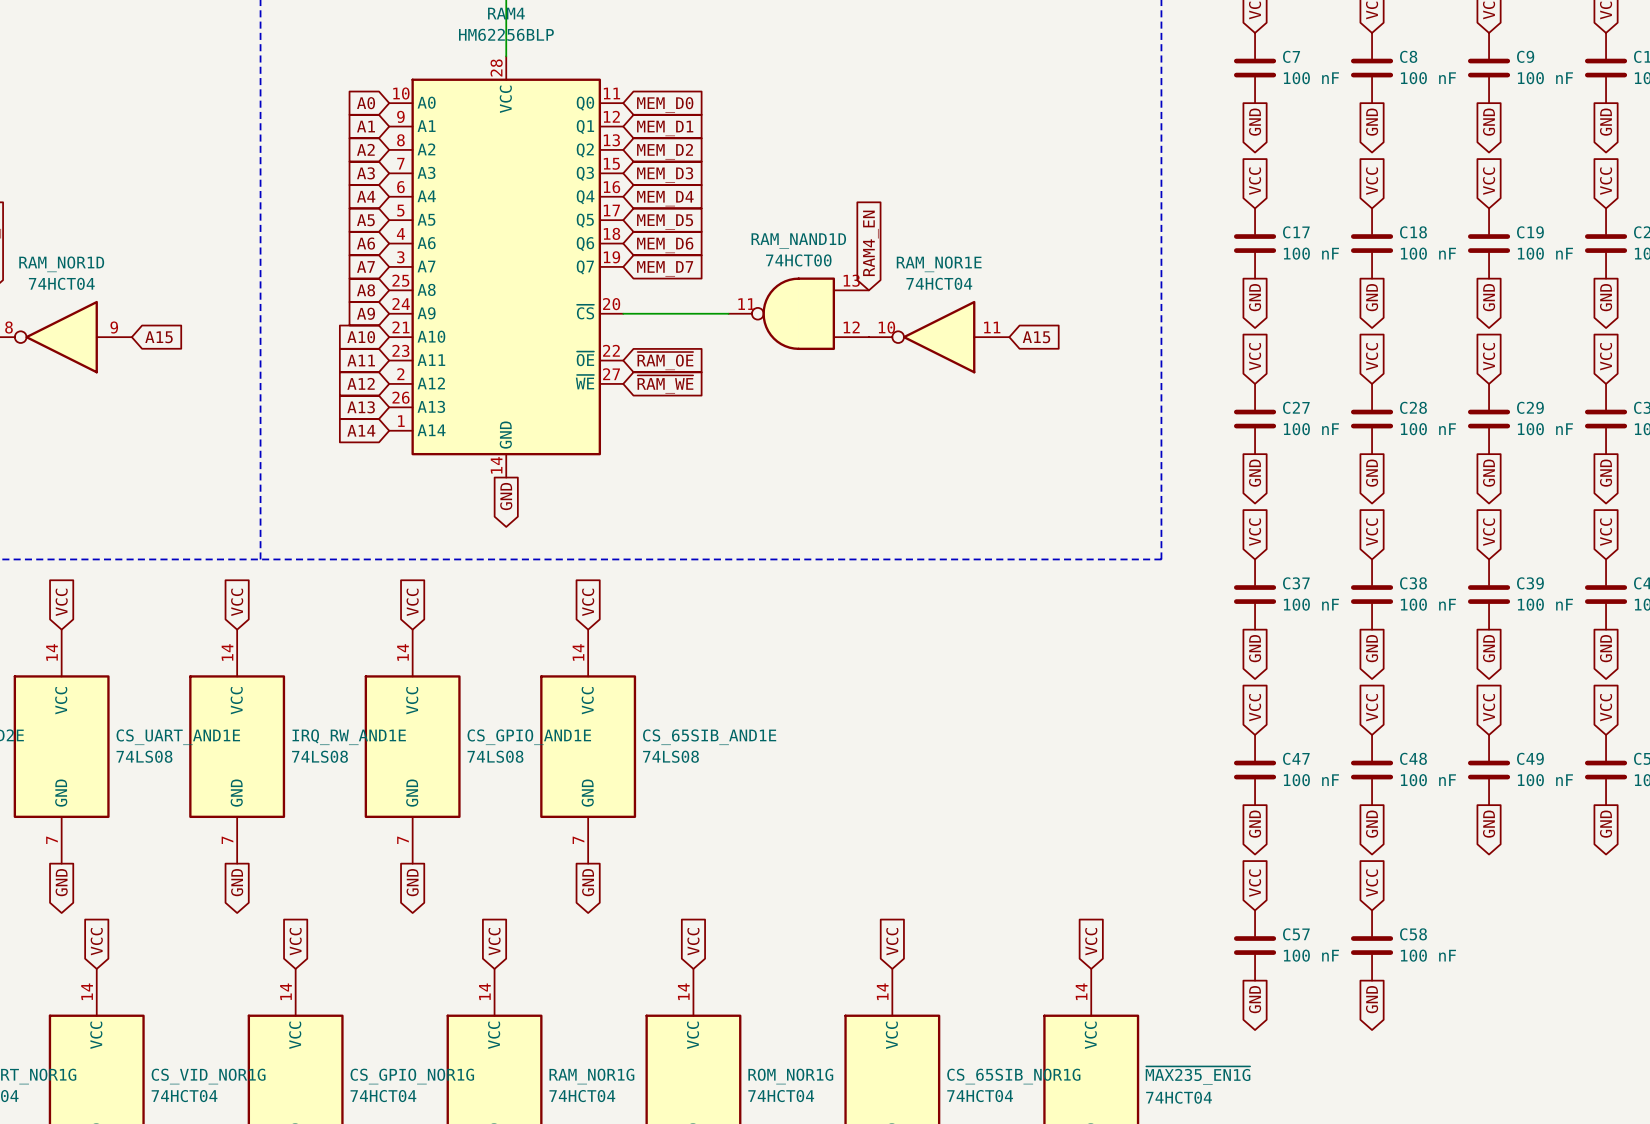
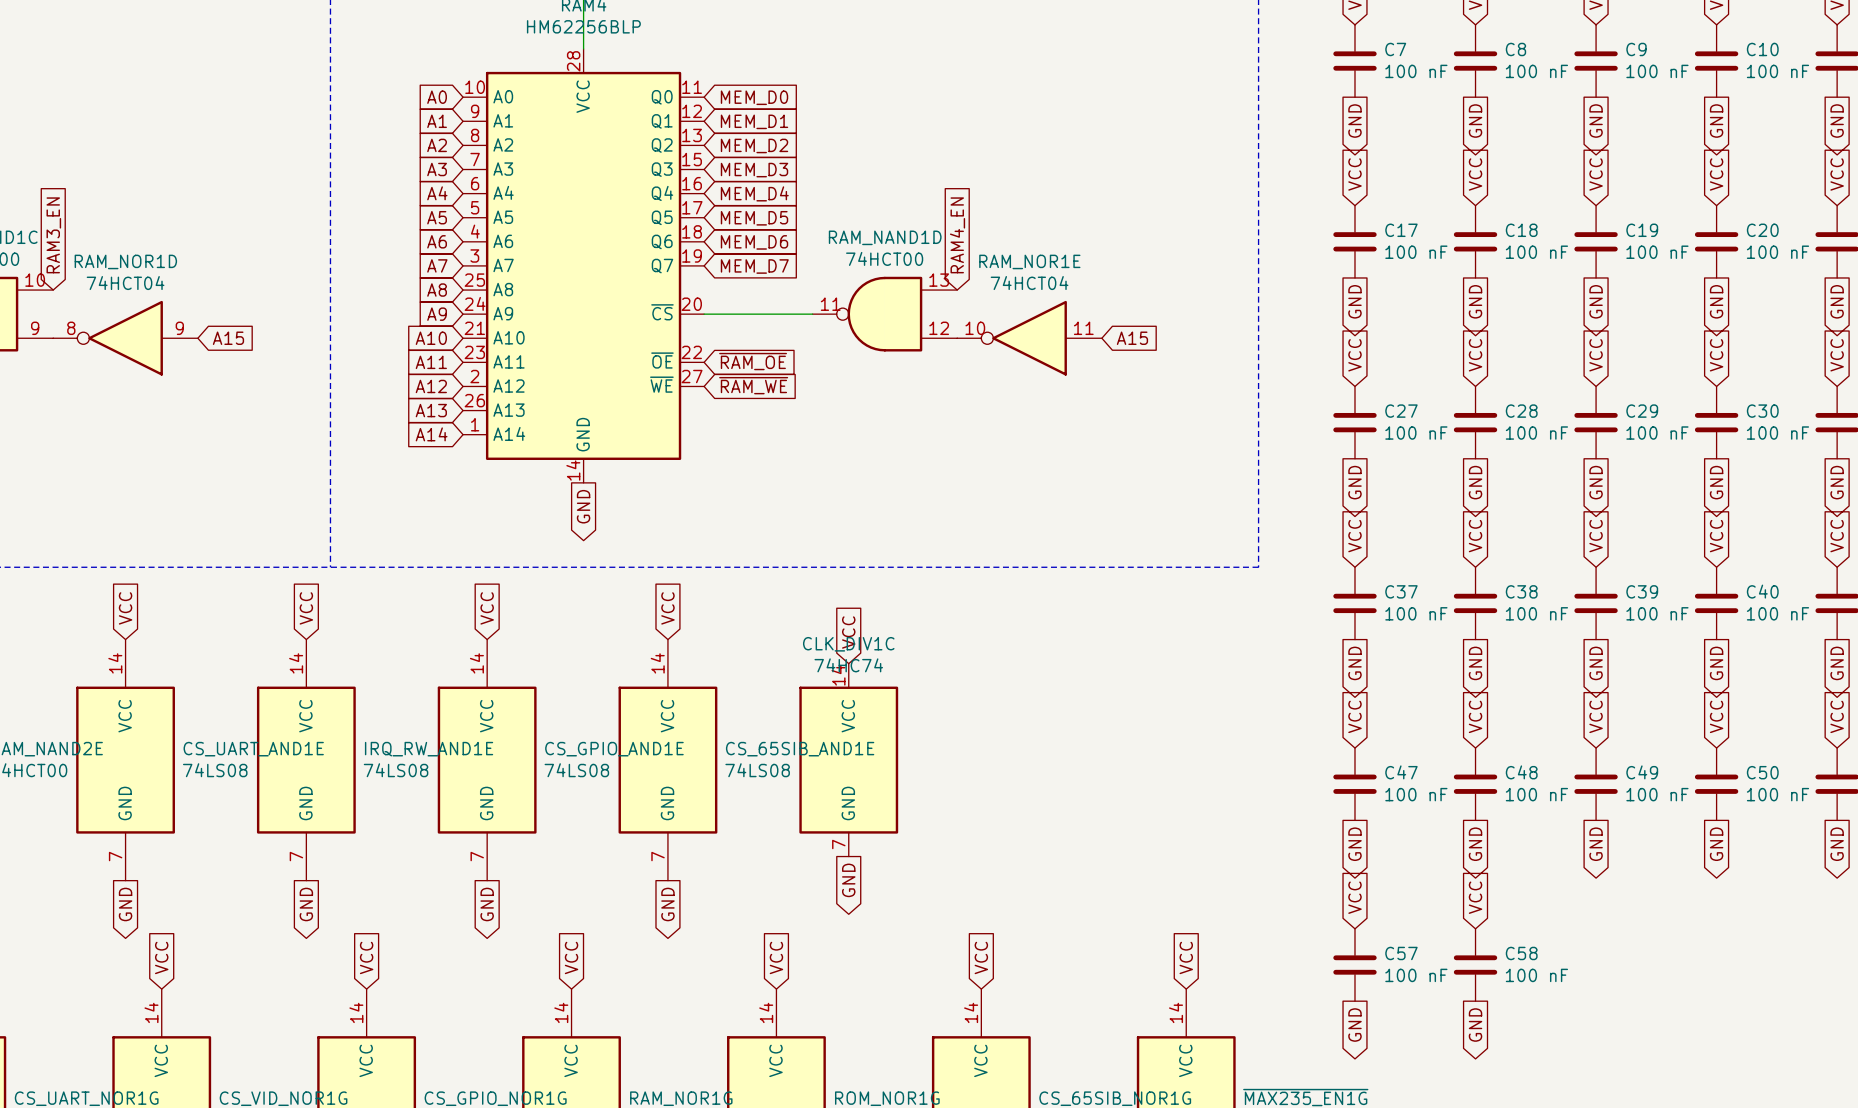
global label: none -> VCC (848, 632)
CLK_DIV1C: none -> 74HC74 (848, 760)
global label: none -> GND (848, 880)

